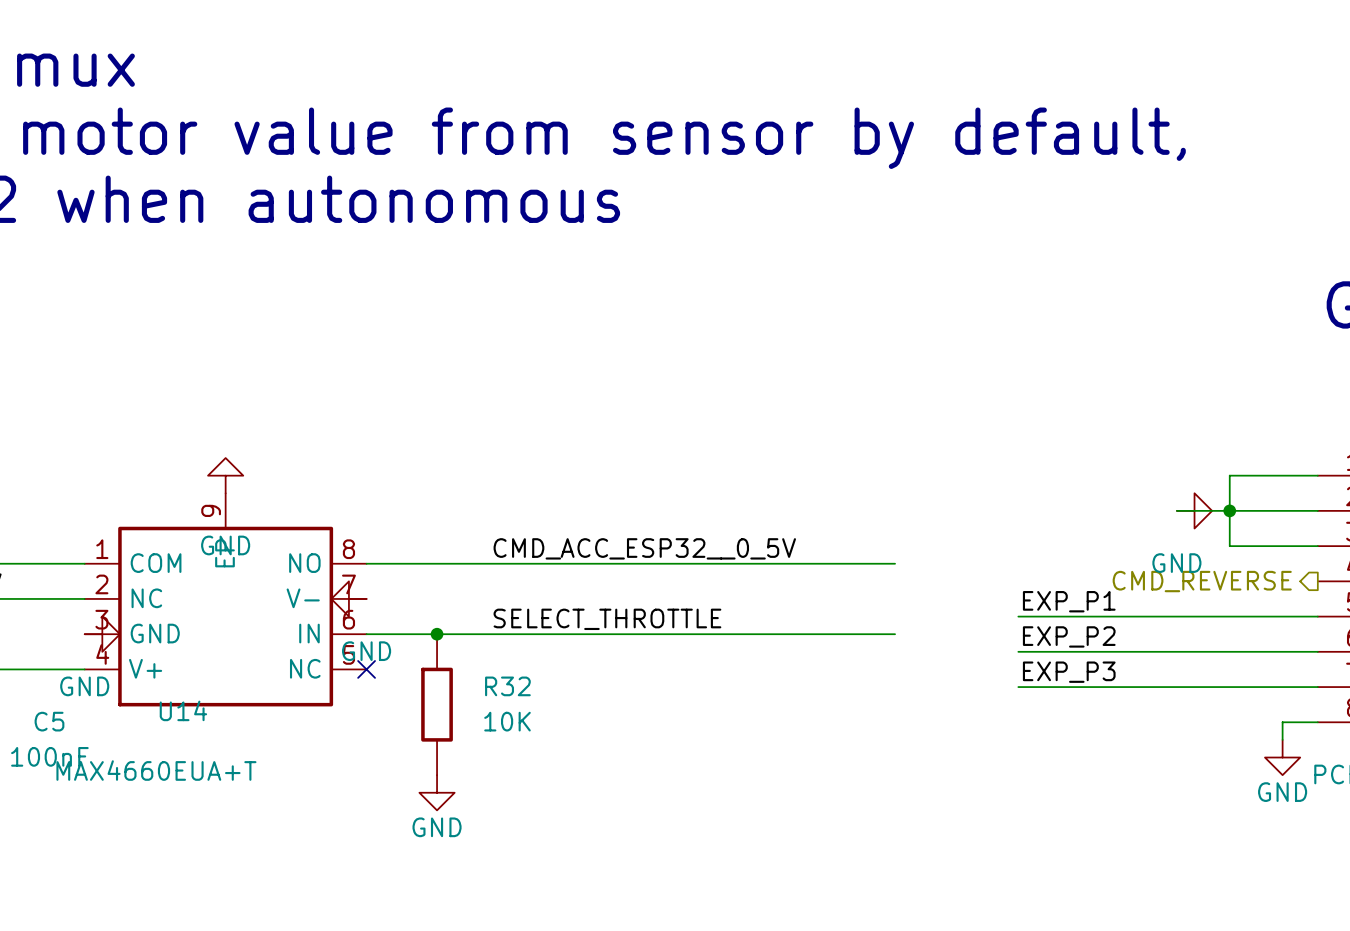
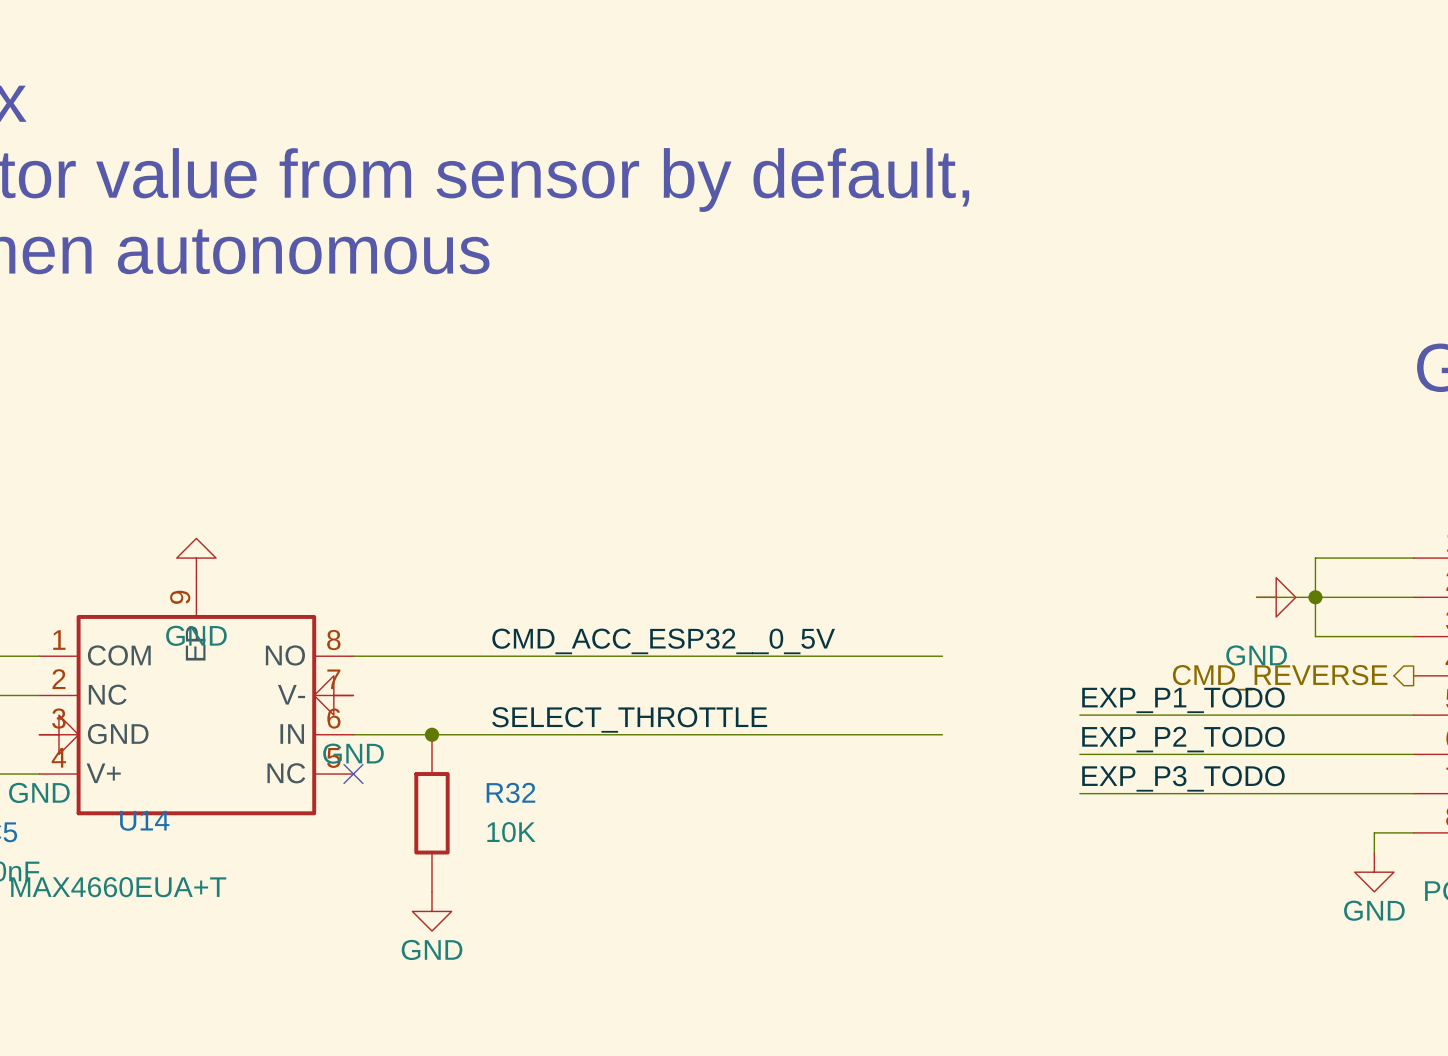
label: EXP_P1 (1069, 601) -> EXP_P1_TODO (1183, 700)
label: EXP_P2 (1069, 636) -> EXP_P2_TODO (1183, 739)
label: EXP_P3 (1069, 672) -> EXP_P3_TODO (1183, 778)

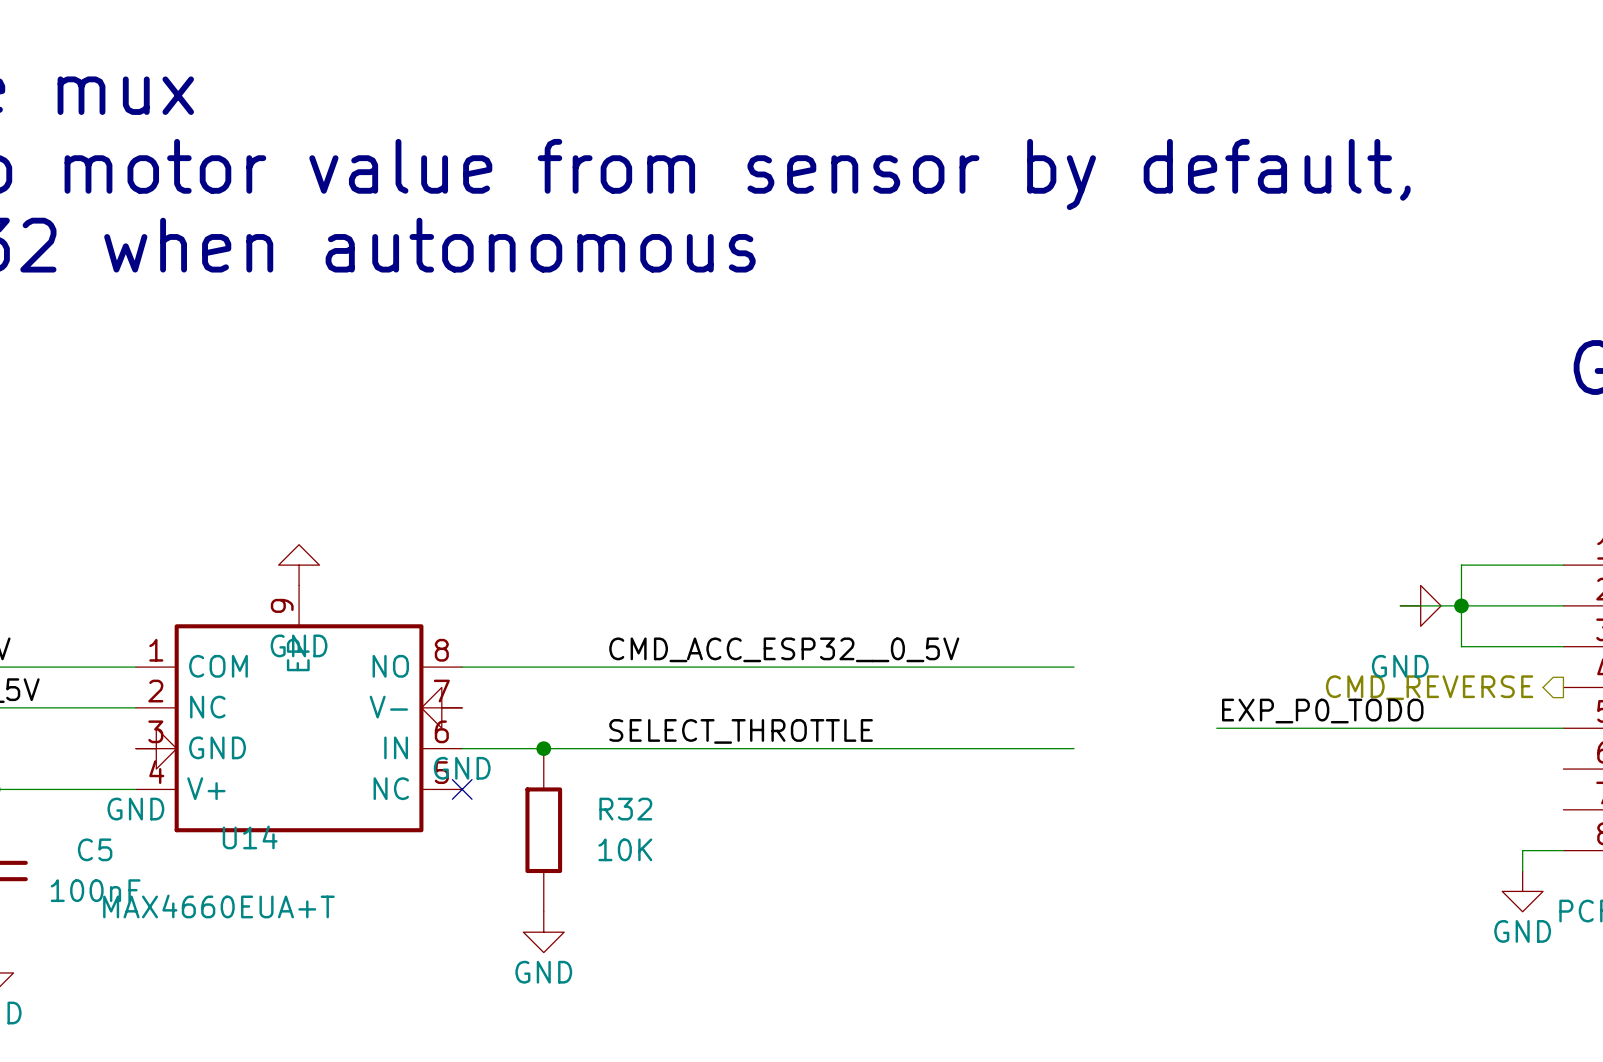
label: EXP_P1_TODO (1183, 700) -> EXP_P0_TODO (1322, 711)
label: EXP_P2_TODO (1183, 739) -> none
wire: (1079, 754) (1413, 754) -> none
label: EXP_P3_TODO (1183, 778) -> none
wire: (1079, 793) (1413, 793) -> none

